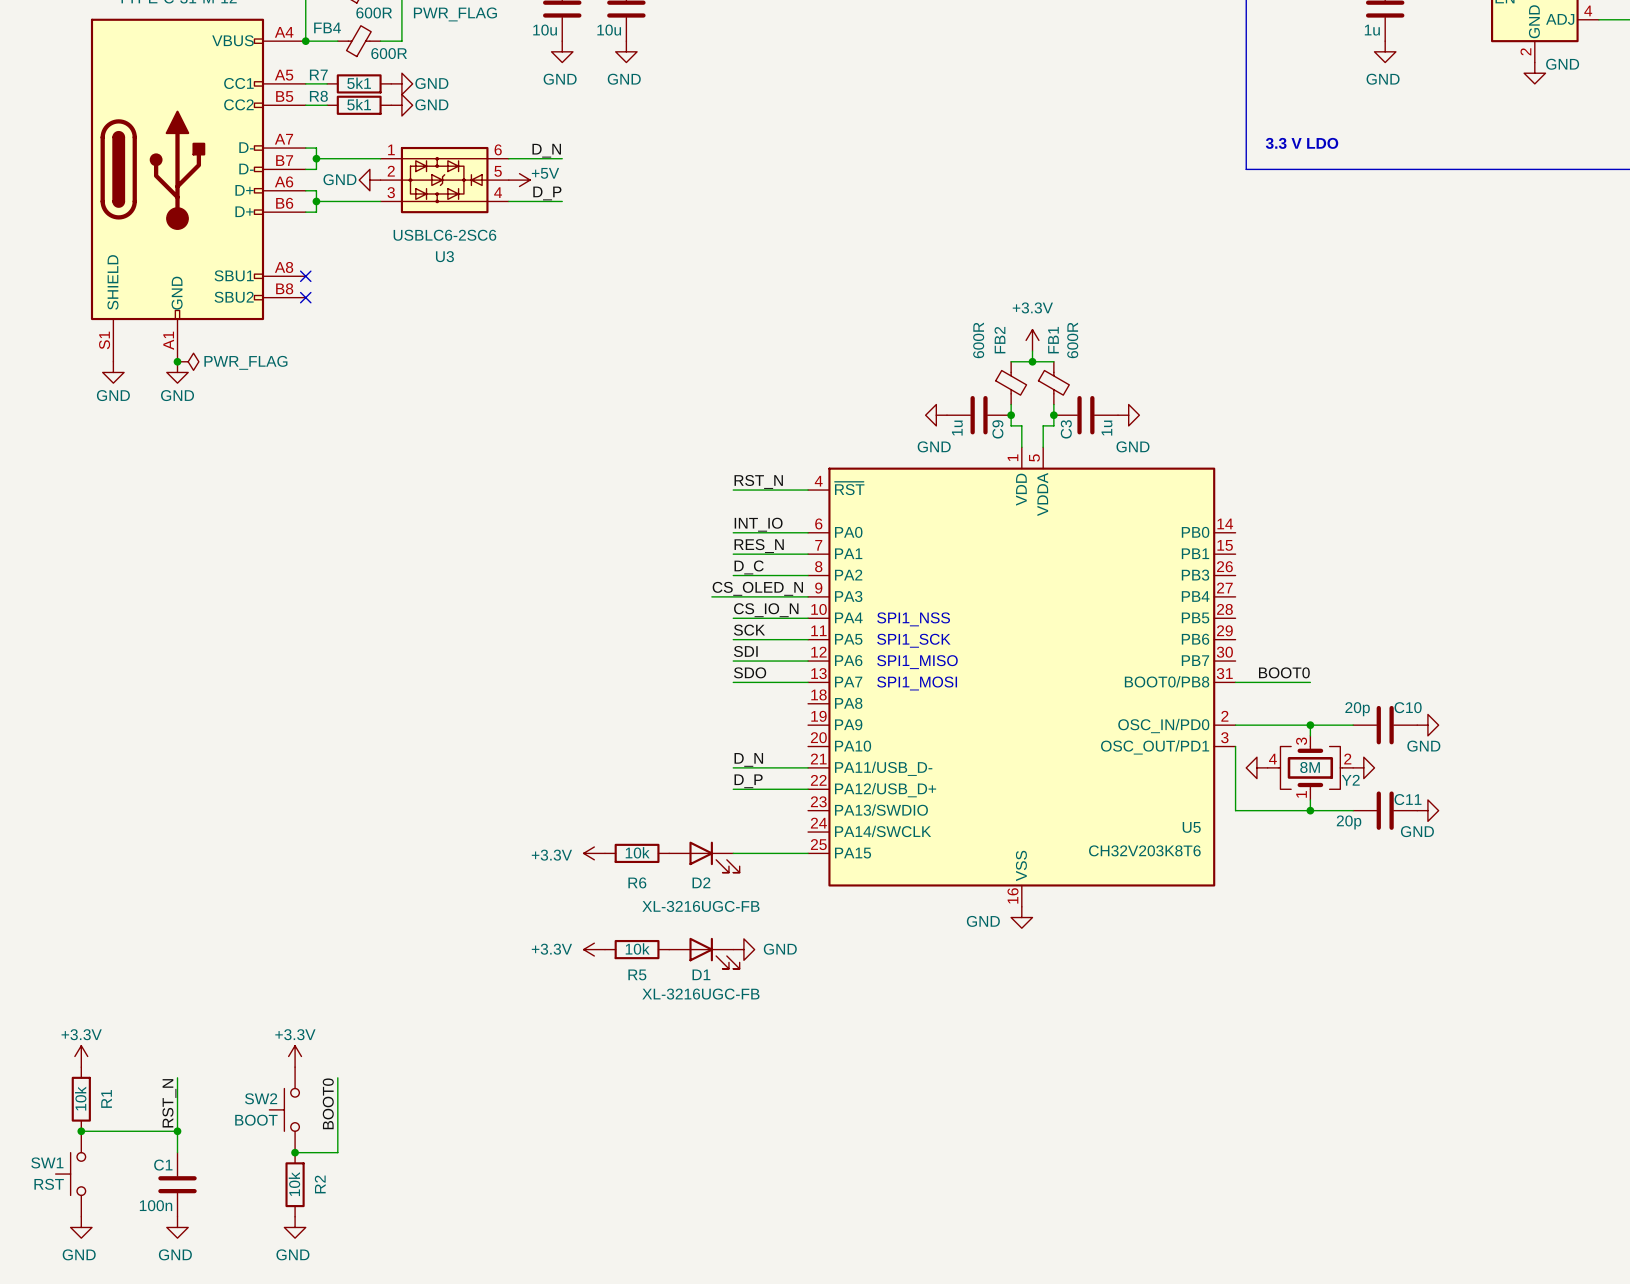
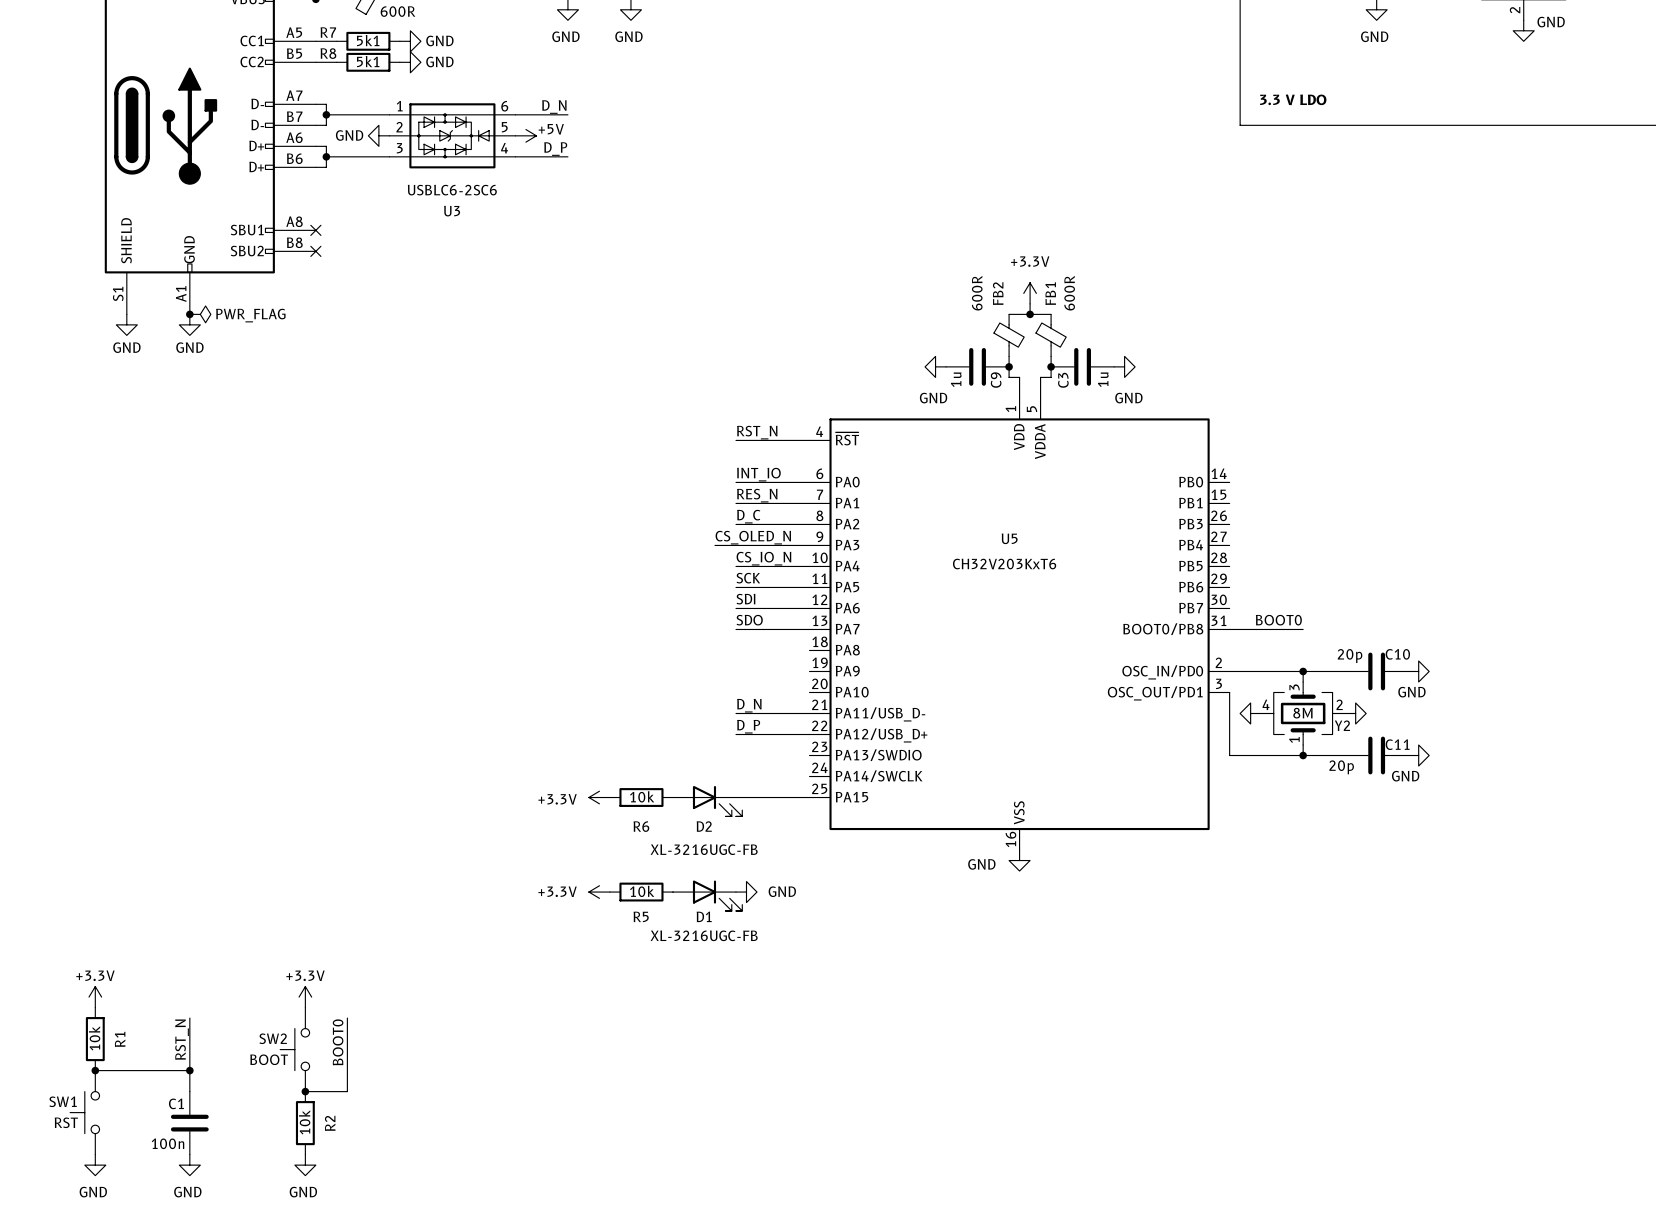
text: SPI1_NSS (913, 619) -> none
text: SPI1_SCK (913, 640) -> none
text: SPI1_MISO (917, 662) -> none
text: SPI1_MOSI (917, 683) -> none
U5 name position: U5 (1191, 827) -> U5 (1009, 538)
U5 value: CH32V203K8T6 (1144, 850) -> CH32V203KxT6 (1004, 564)

